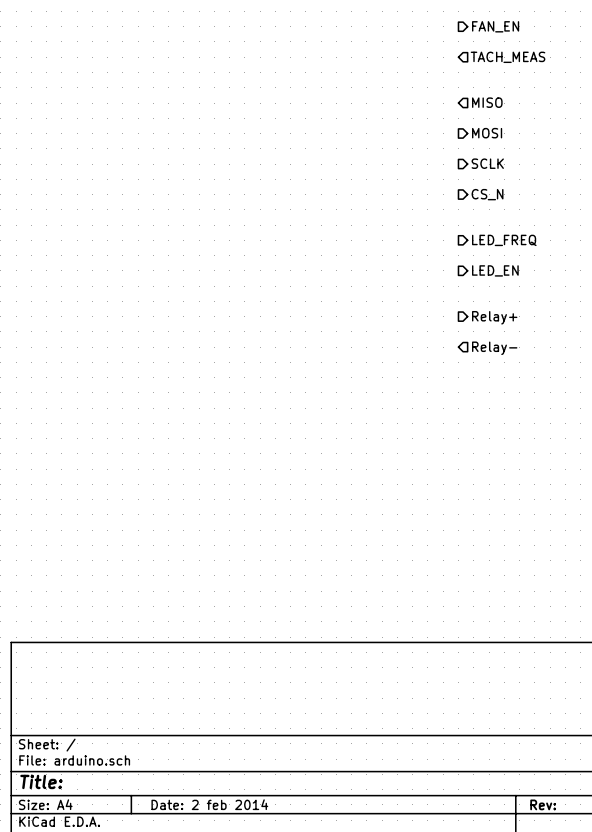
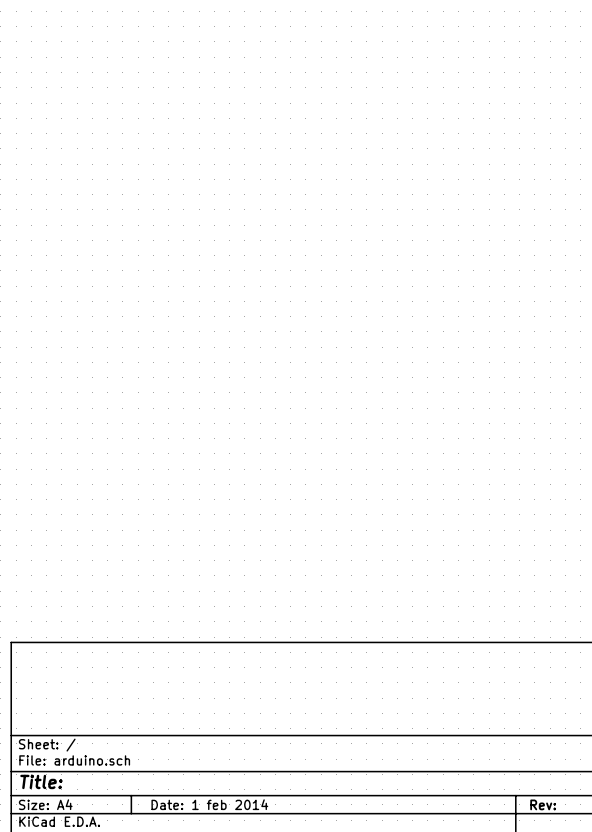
hierarchical label: FAN_EN (495, 26) -> none
hierarchical label: TACH_MEAS (508, 57) -> none
hierarchical label: MISO (487, 102) -> none
hierarchical label: MOSI (487, 133) -> none
hierarchical label: SCLK (487, 163) -> none
hierarchical label: CS_N (487, 194) -> none
hierarchical label: LED_FREQ (504, 240) -> none
hierarchical label: LED_EN (495, 270) -> none
hierarchical label: Relay+ (494, 317) -> none
hierarchical label: Relay- (494, 348) -> none
title block: Date: 2 feb 2014 (209, 804) -> Date: 1 feb 2014 (209, 804)

